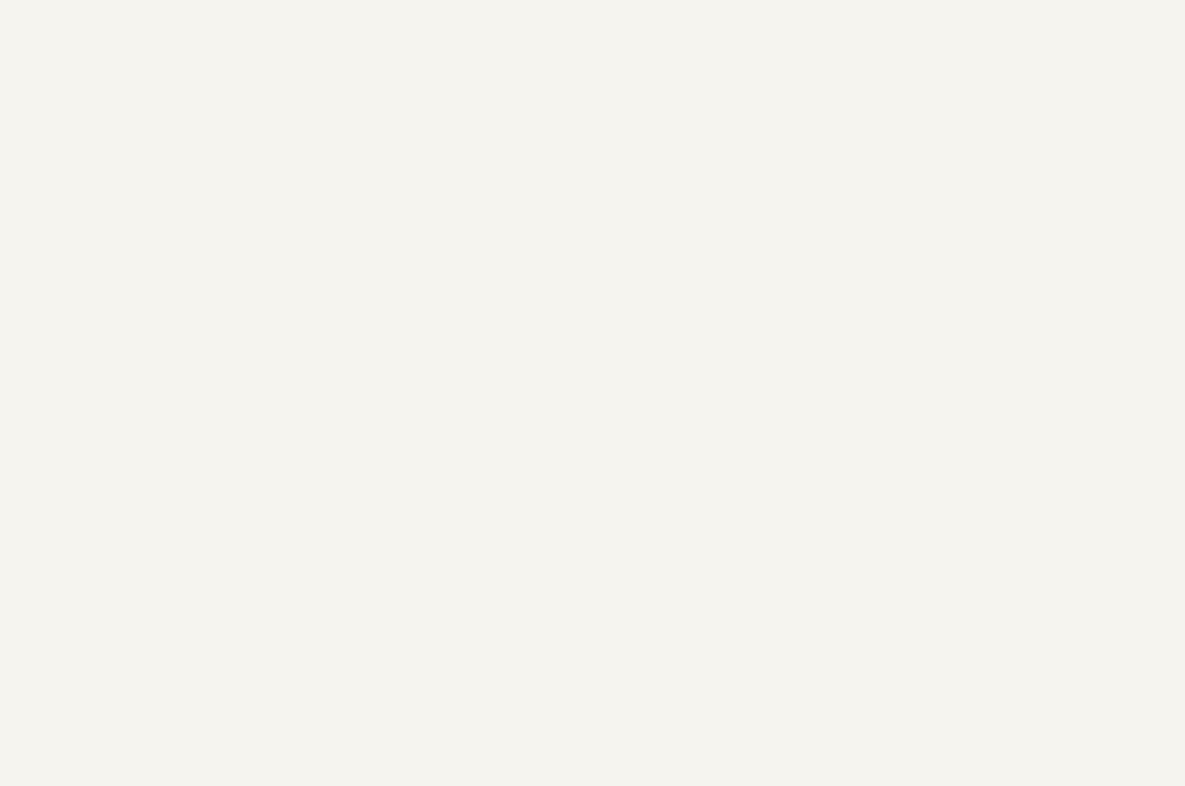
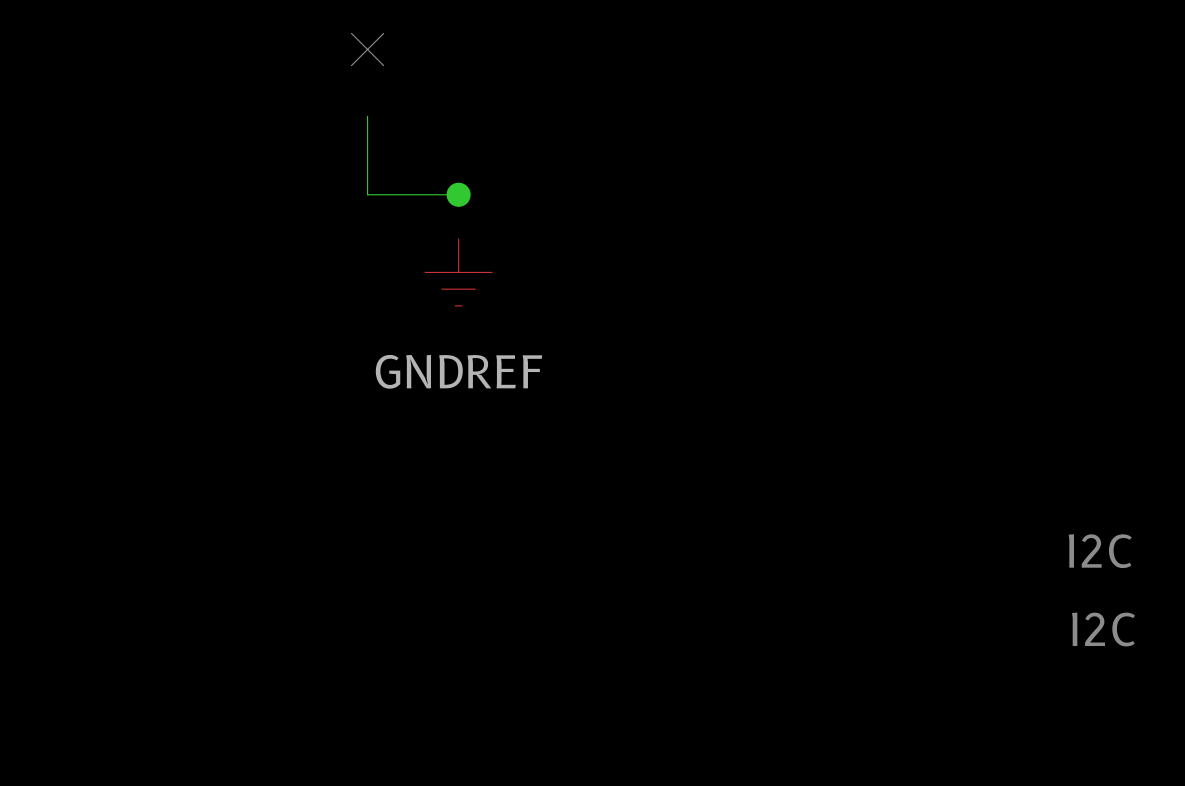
no-connect mark: none -> (367, 49)
wire: none -> (367, 116) (367, 194) (458, 194)
junction: none -> (458, 194)
power symbol: none -> GNDREF (458, 272)
text: none -> I2C (1100, 551)
text: none -> I2C (1103, 629)

